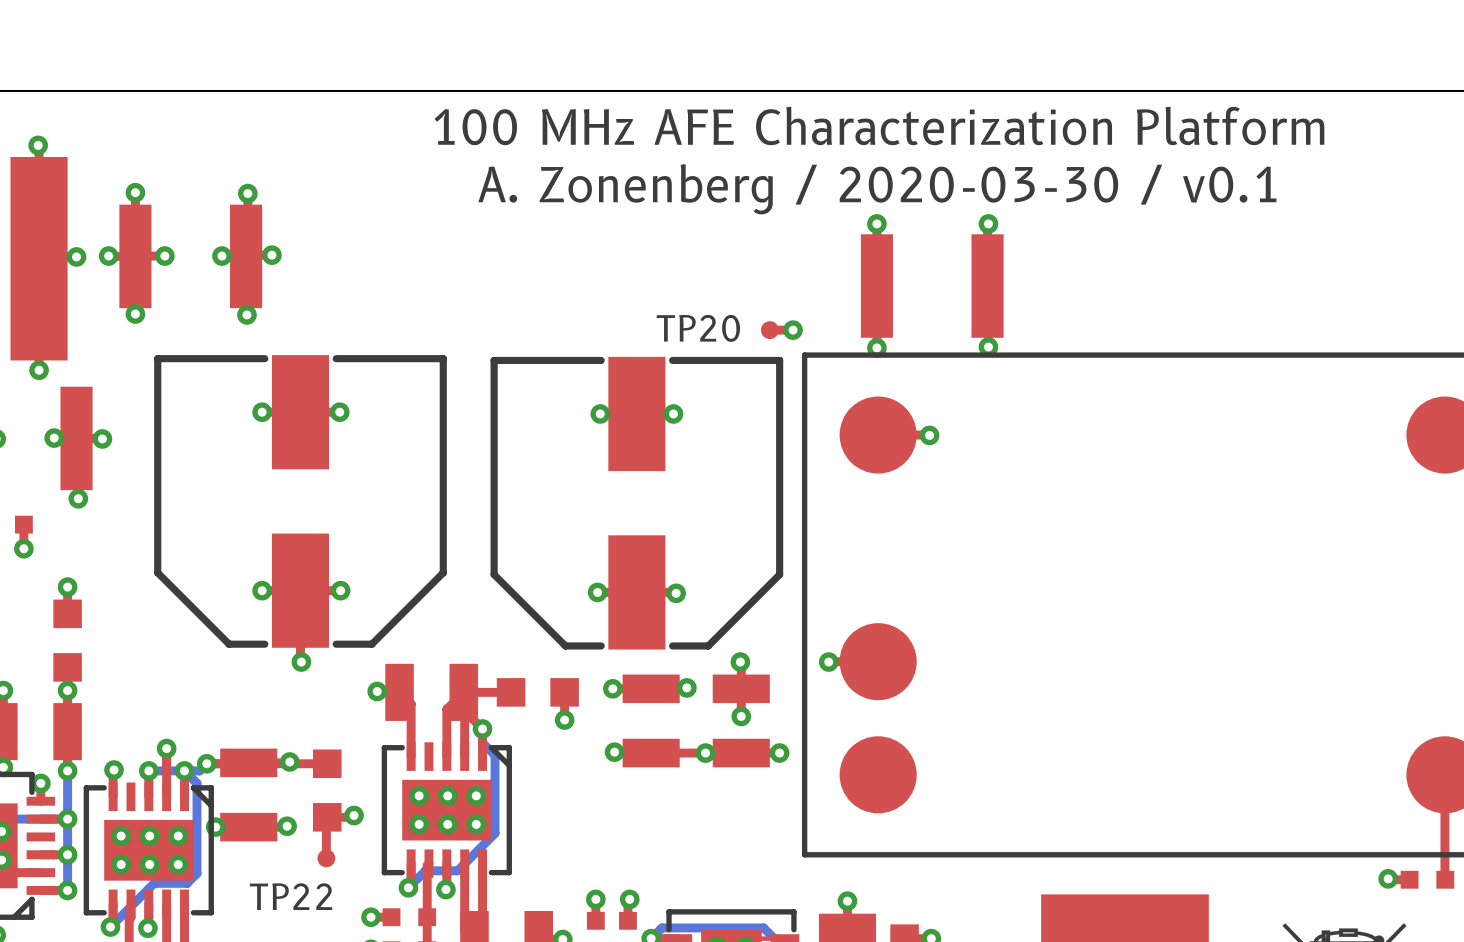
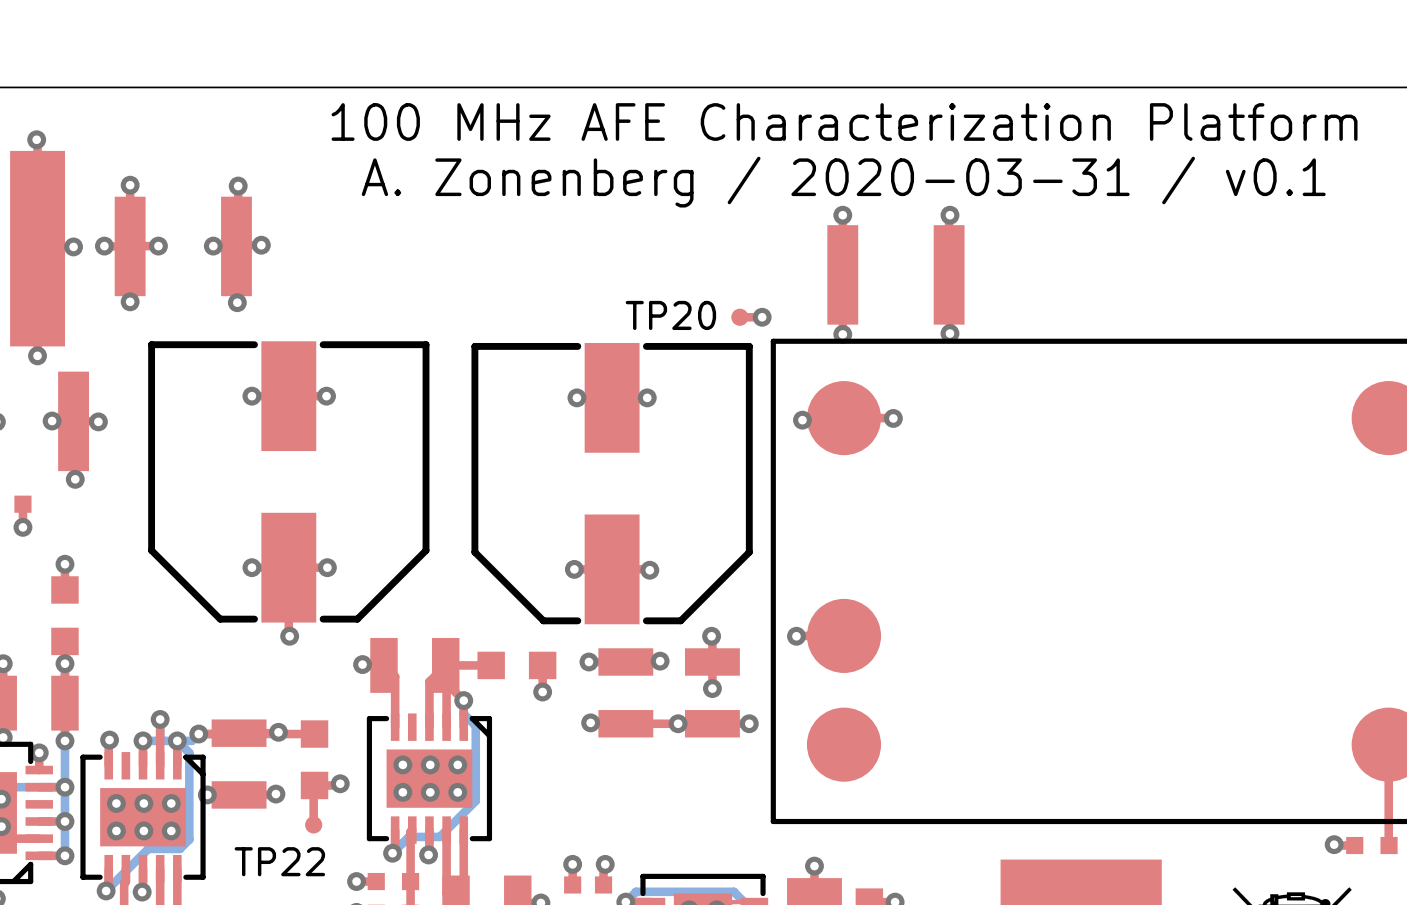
text: A. Zonenberg / 2020-03-30 / v0.1 (877, 189) -> A. Zonenberg / 2020-03-31 / v0.1 (843, 182)
via: none -> (802, 420)

